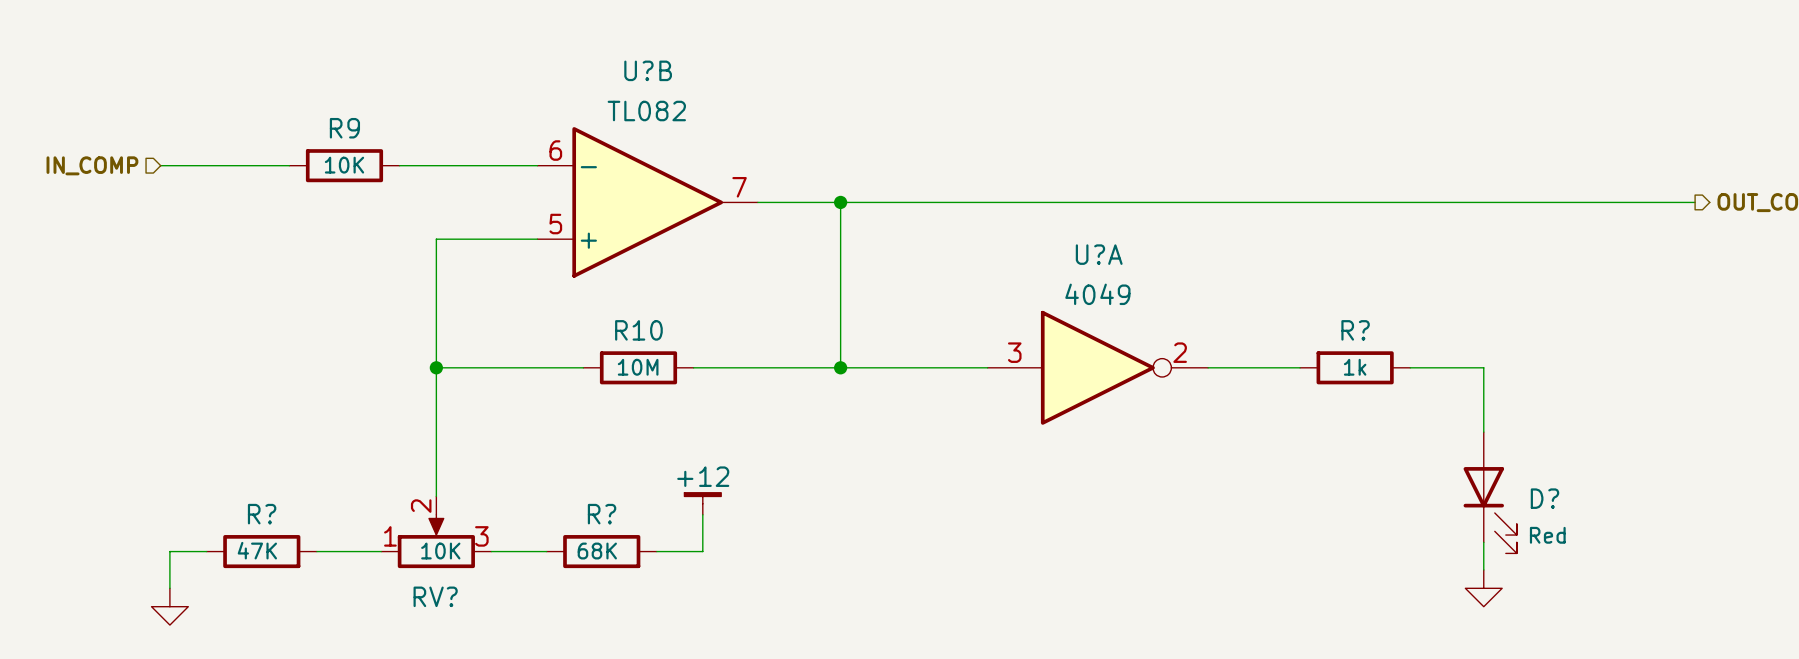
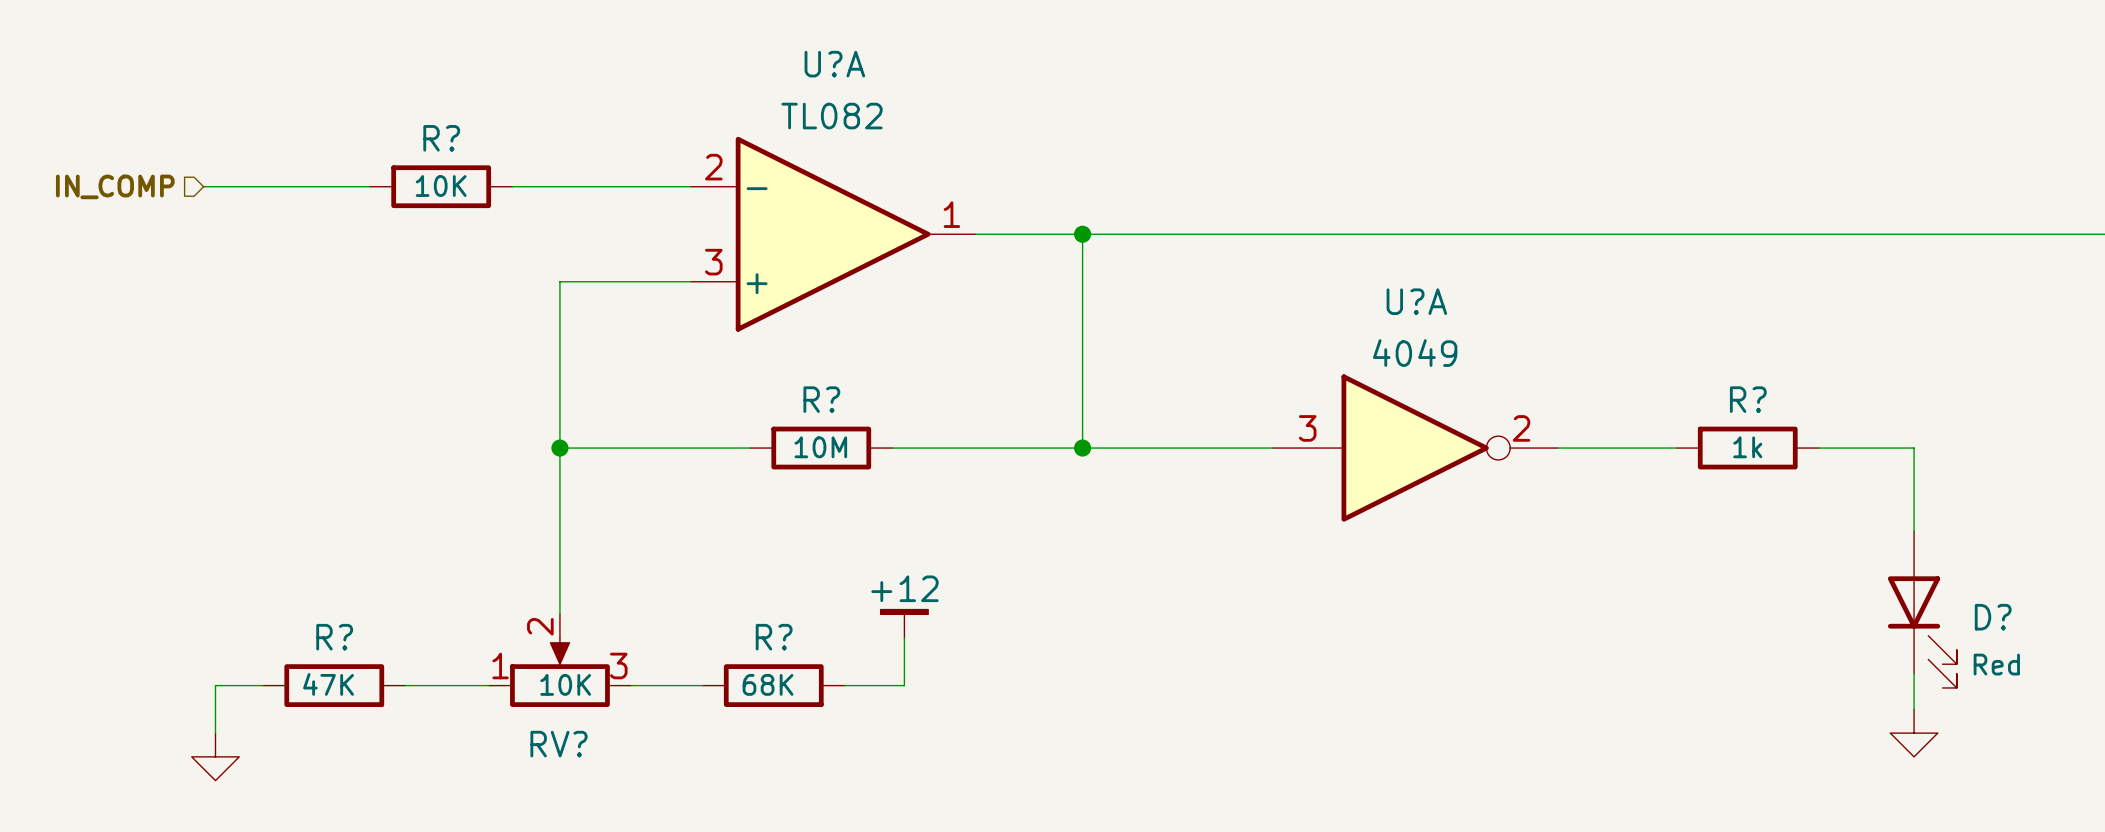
U?B name: U?B (648, 70) -> U?A (834, 64)
R9 name: R9 (344, 128) -> R? (441, 138)
U?B pin number: 6 (555, 150) -> 2 (713, 167)
U?B pin number: 7 (739, 187) -> 1 (951, 214)
U?B pin number: 5 (555, 224) -> 3 (713, 262)
R10 name: R10 (638, 330) -> R? (821, 399)

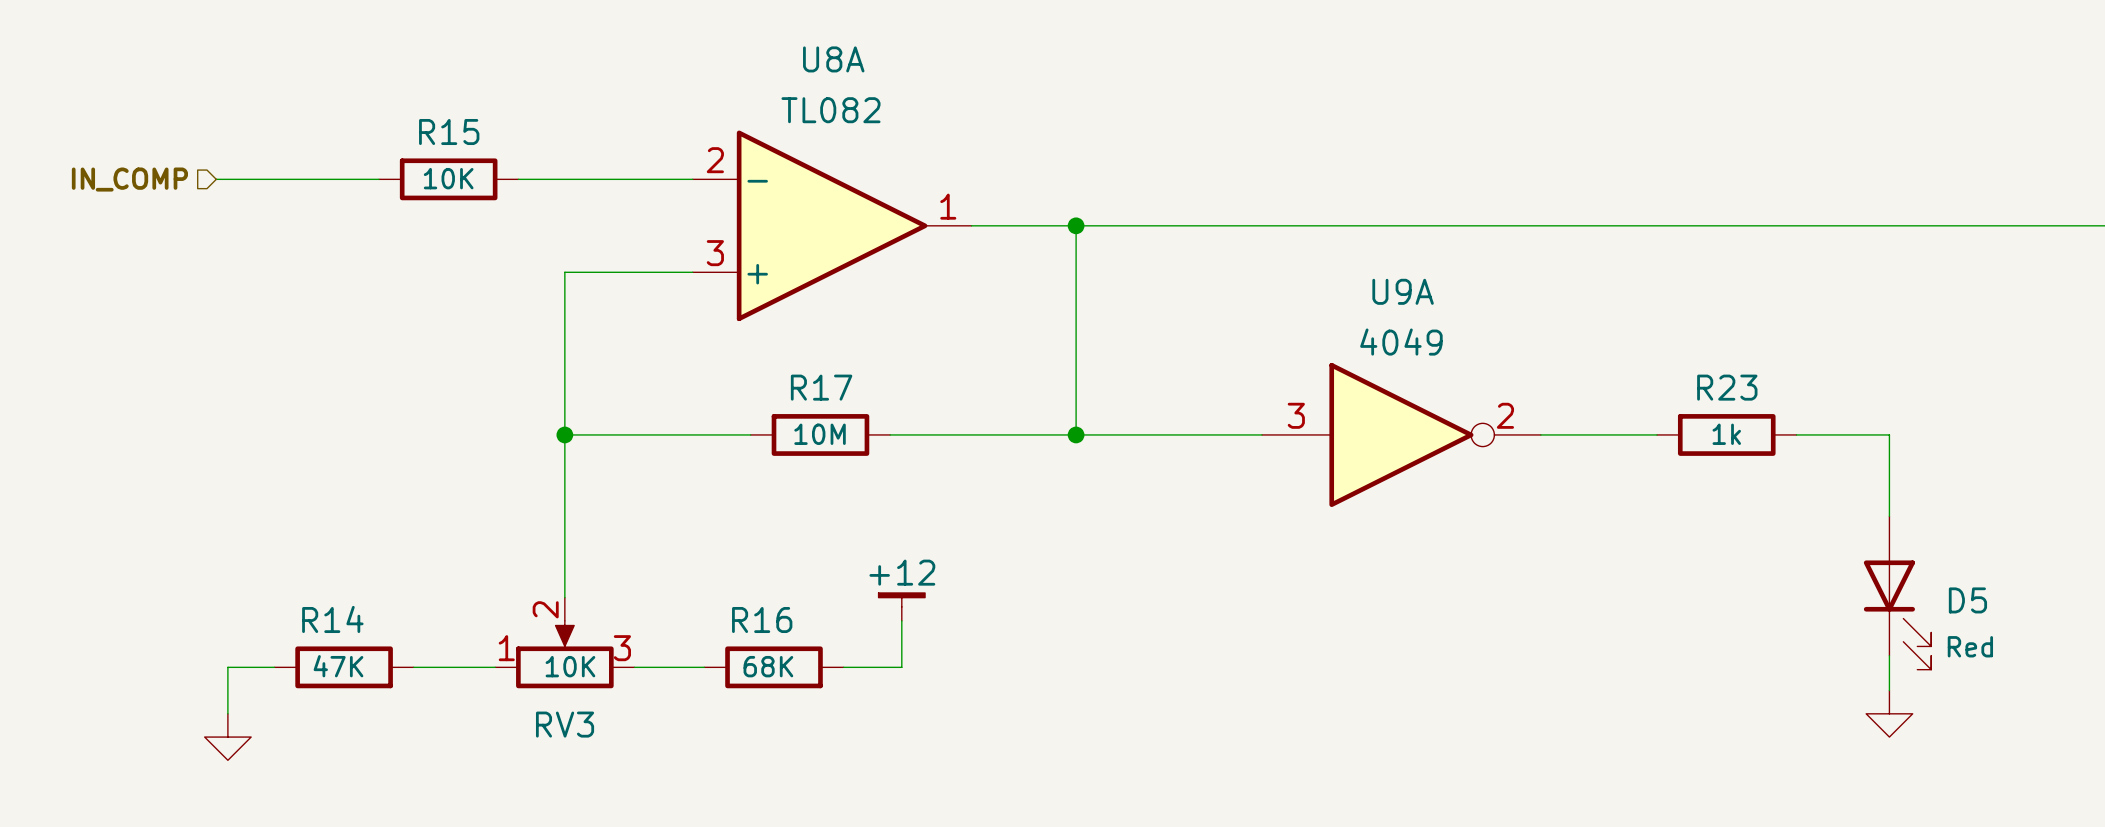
U?A name: U?A (834, 64) -> U8A (833, 59)
R? name: R? (441, 138) -> R15 (449, 132)
U?A name: U?A (1416, 301) -> U9A (1403, 291)
R? name: R? (821, 399) -> R17 (821, 387)
R? name: R? (1748, 399) -> R23 (1727, 387)
D? name: D? (1993, 617) -> D5 (1967, 600)
R? name: R? (334, 637) -> R14 (332, 619)
R? name: R? (774, 637) -> R16 (762, 620)
RV? name: RV? (559, 744) -> RV3 (565, 724)

